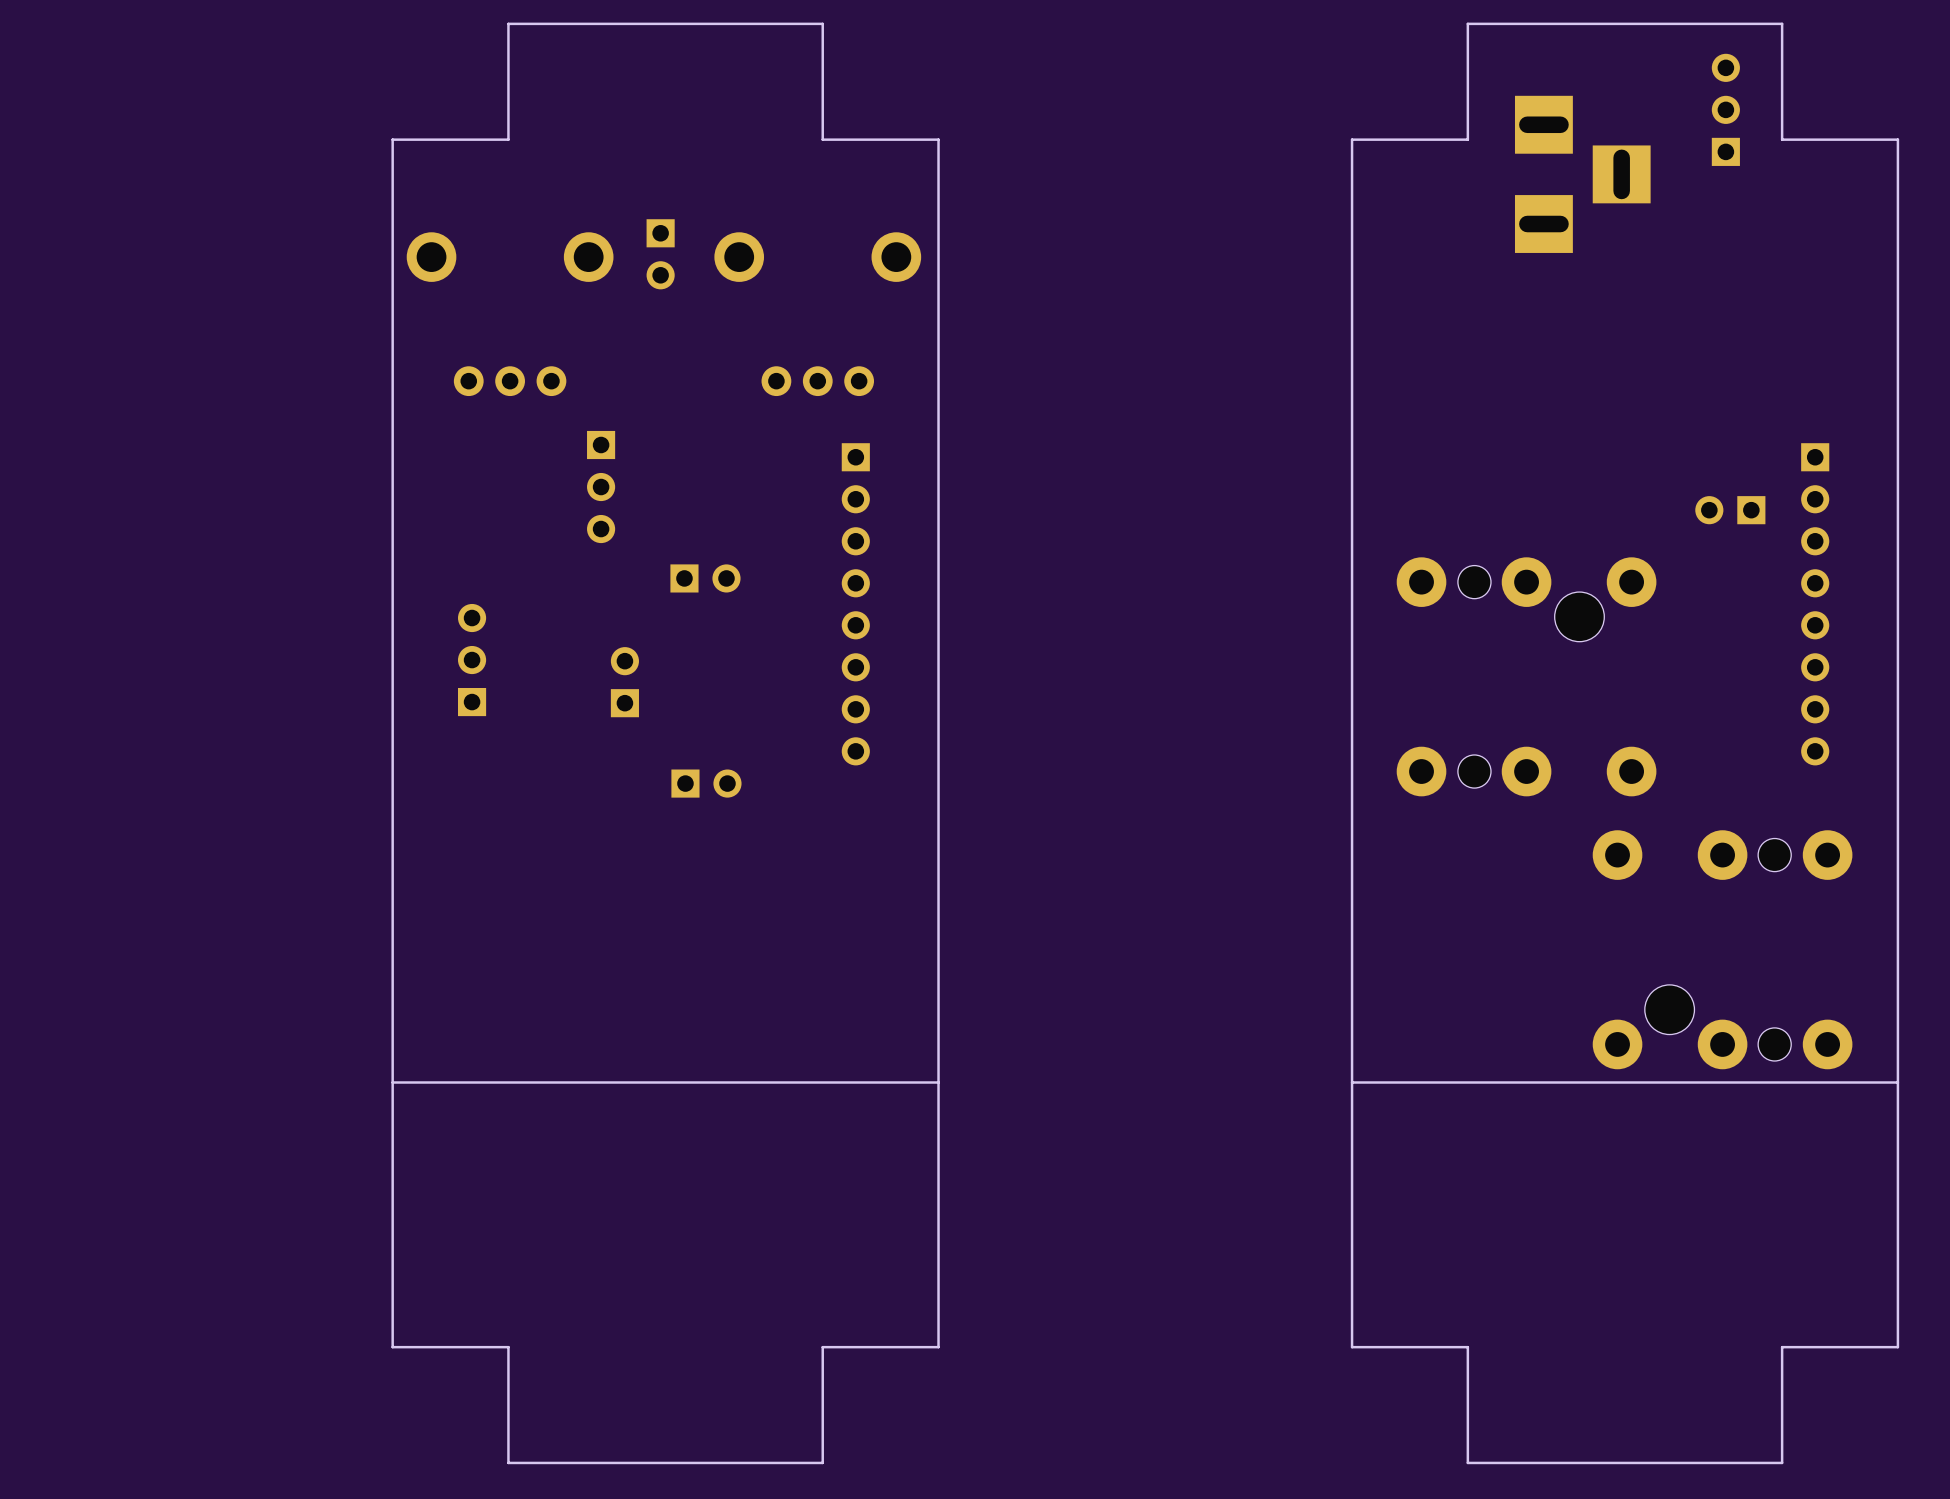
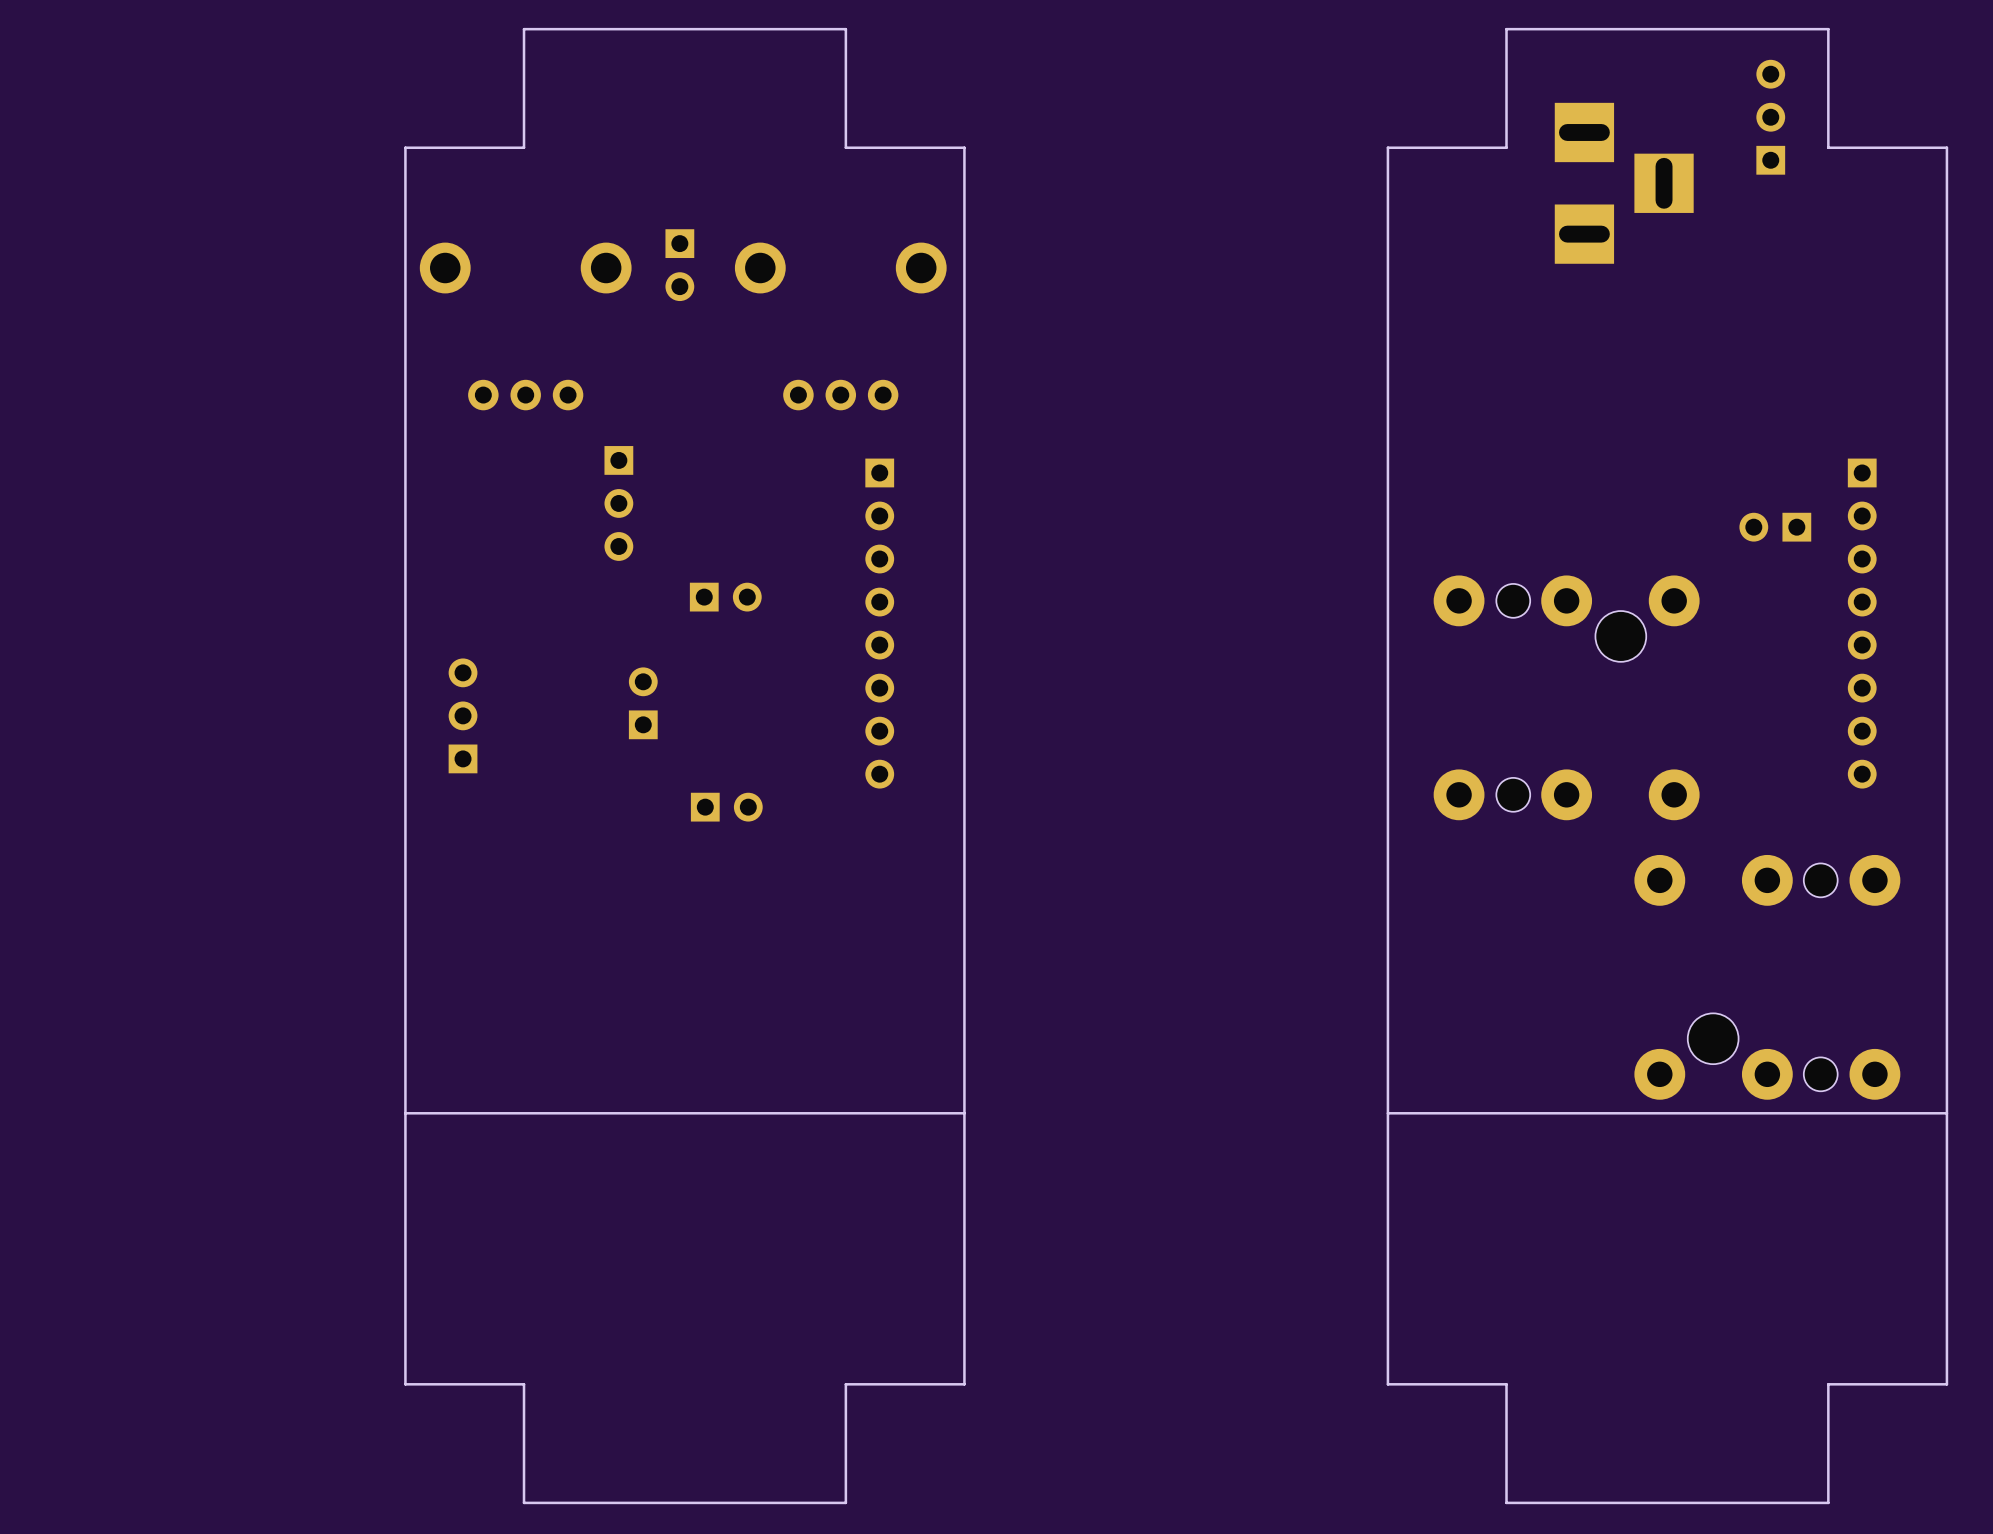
part position: (472, 660) -> (463, 715)

